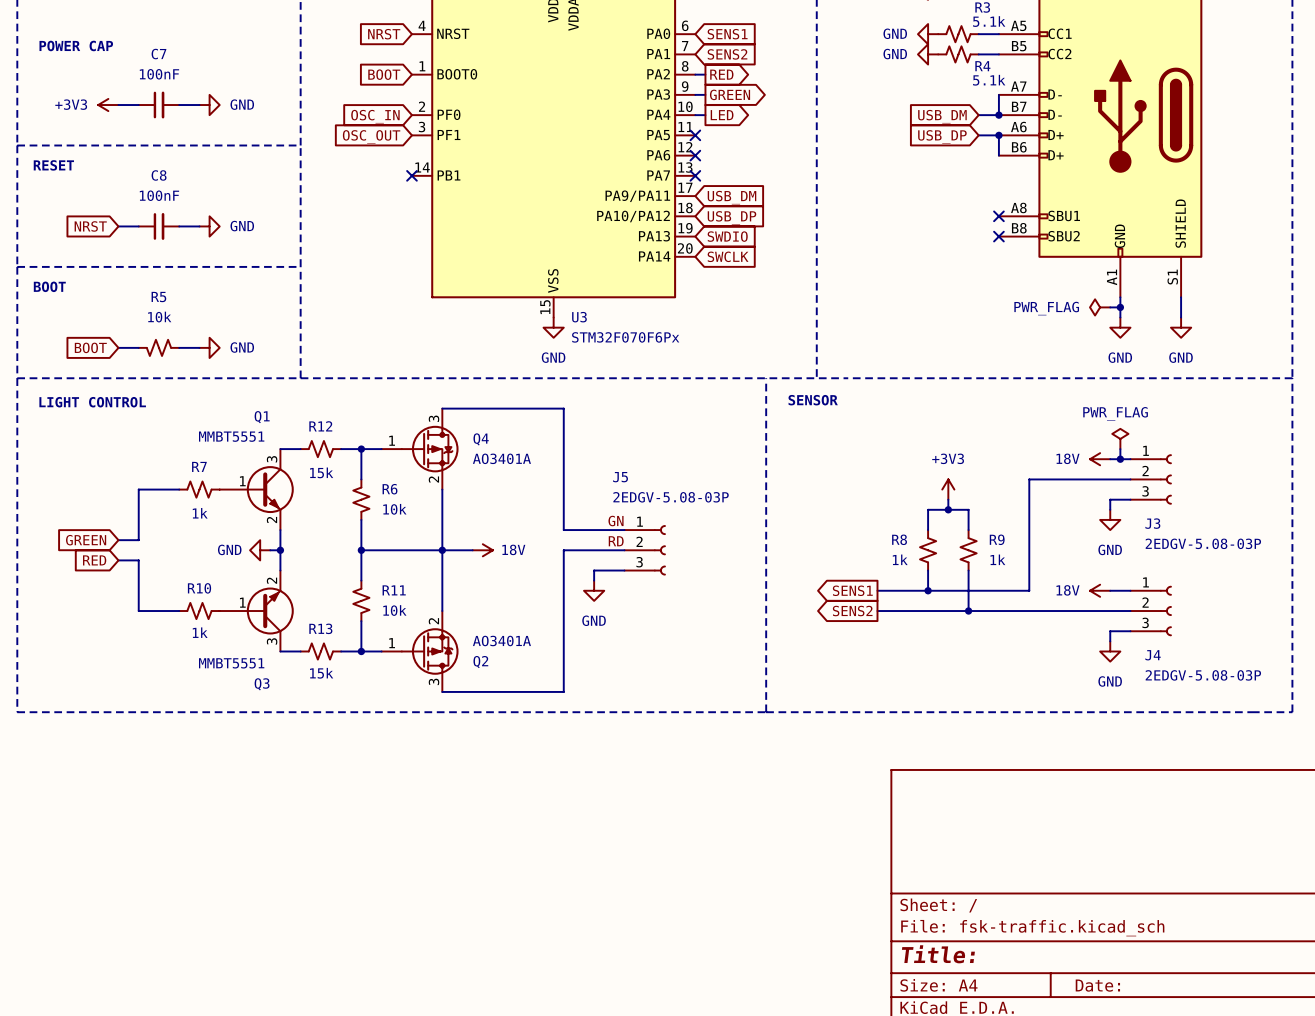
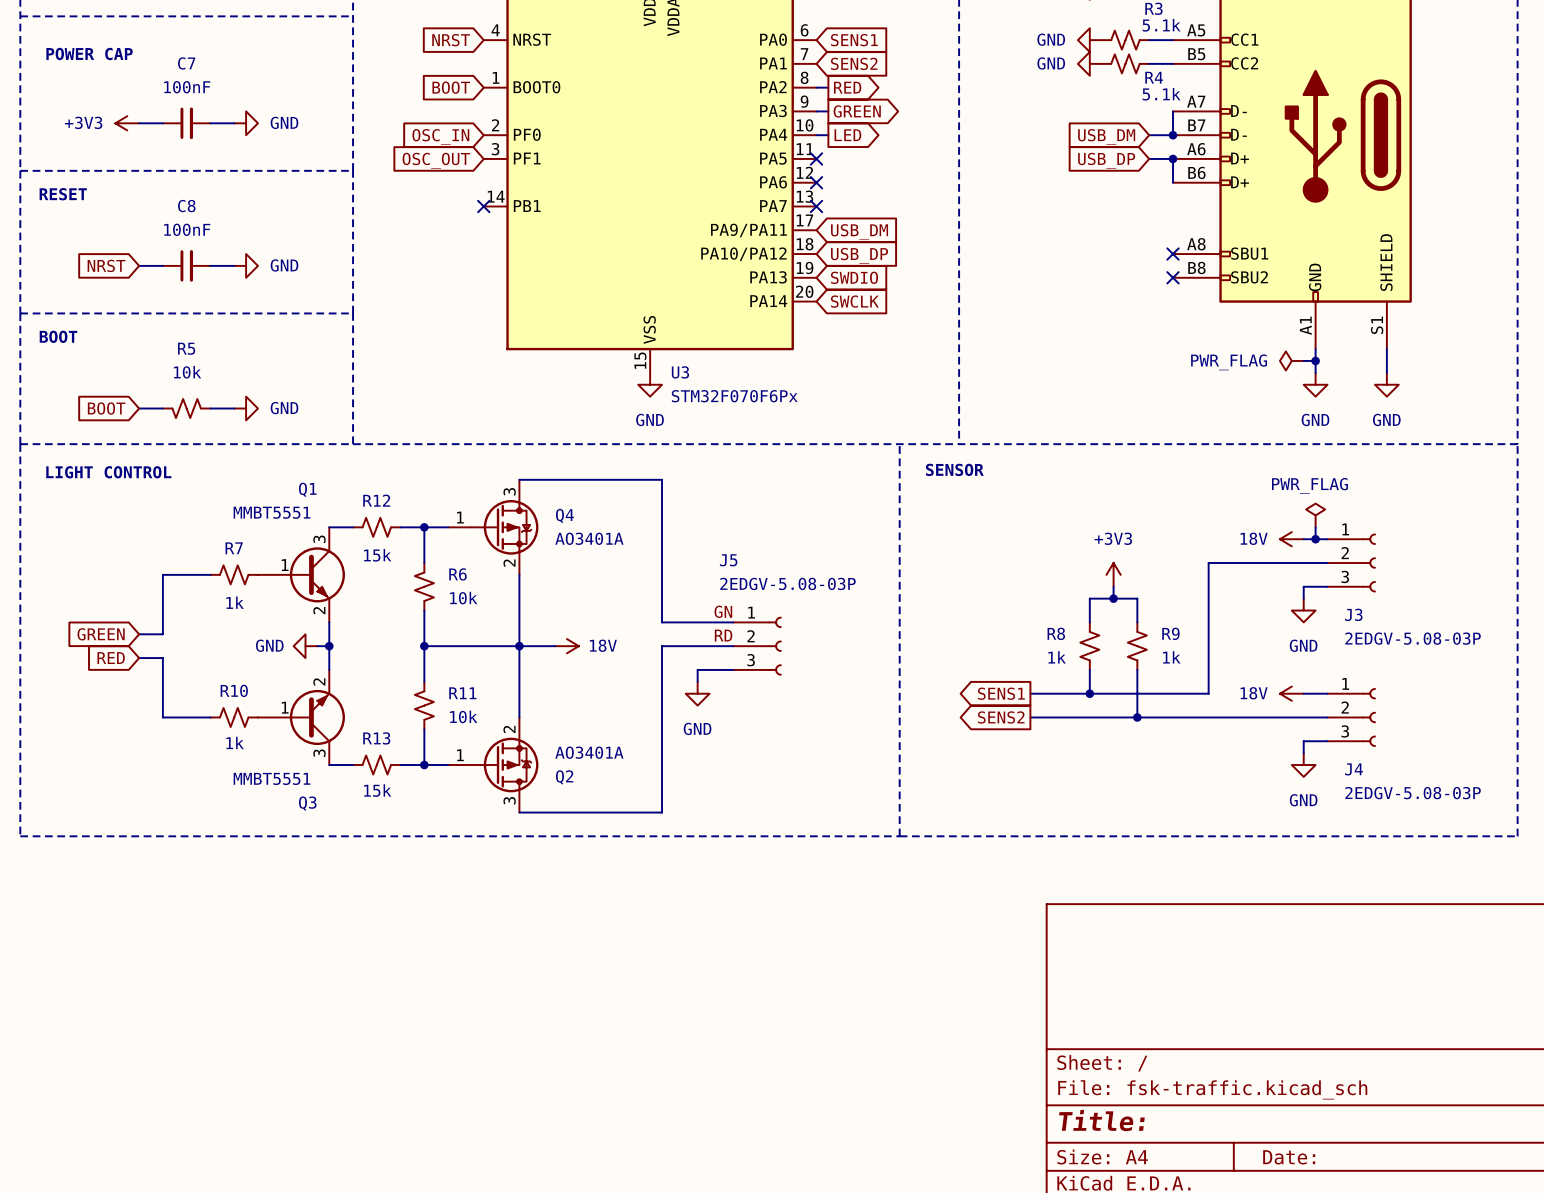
line: none -> (20, 16) (353, 16)

